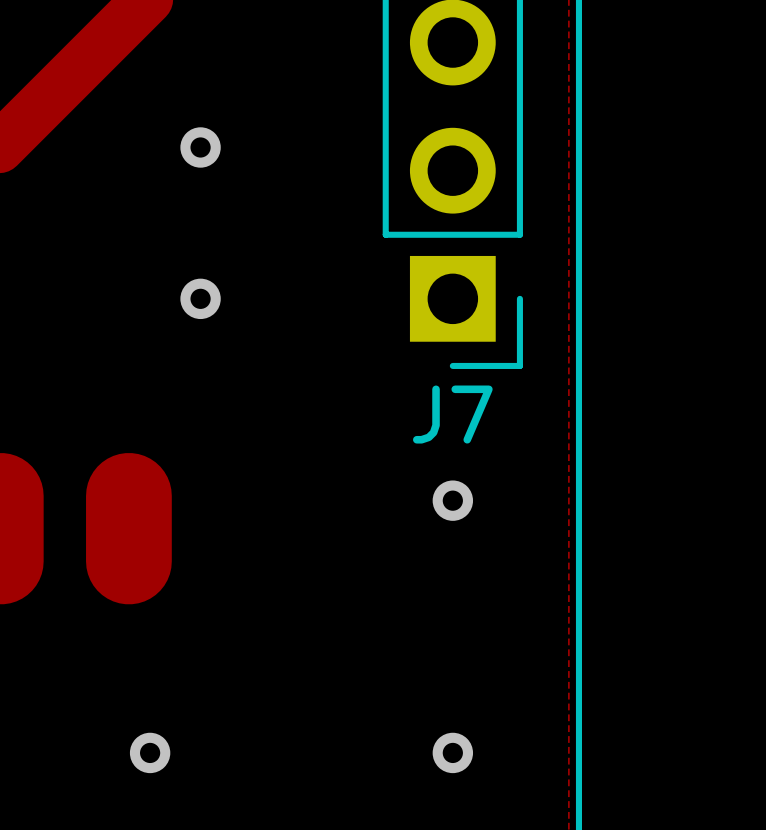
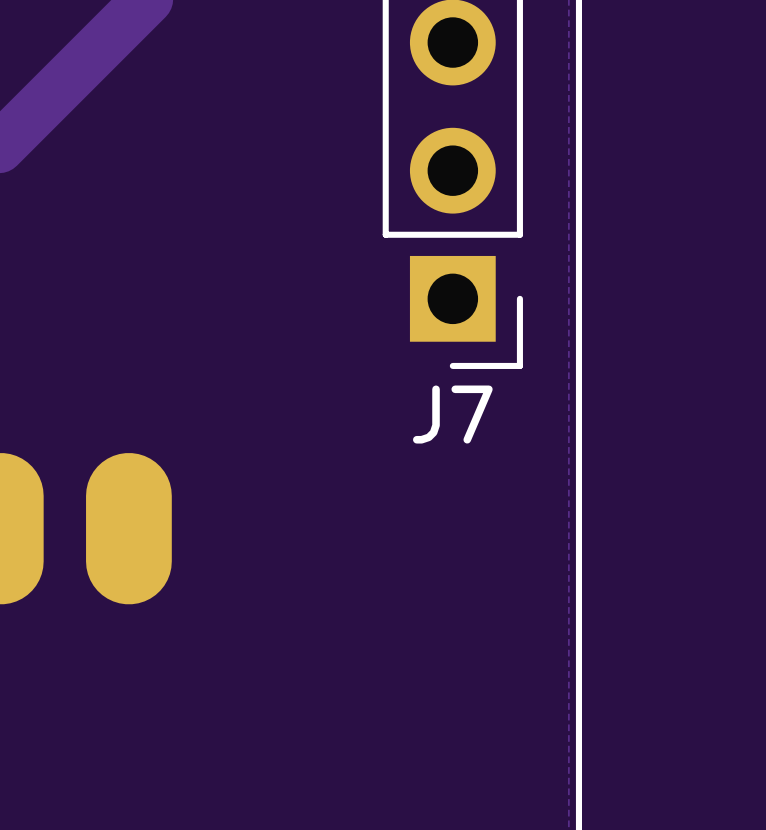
via: (200, 147) -> none
via: (200, 298) -> none
via: (452, 500) -> none
via: (150, 752) -> none
via: (452, 752) -> none

